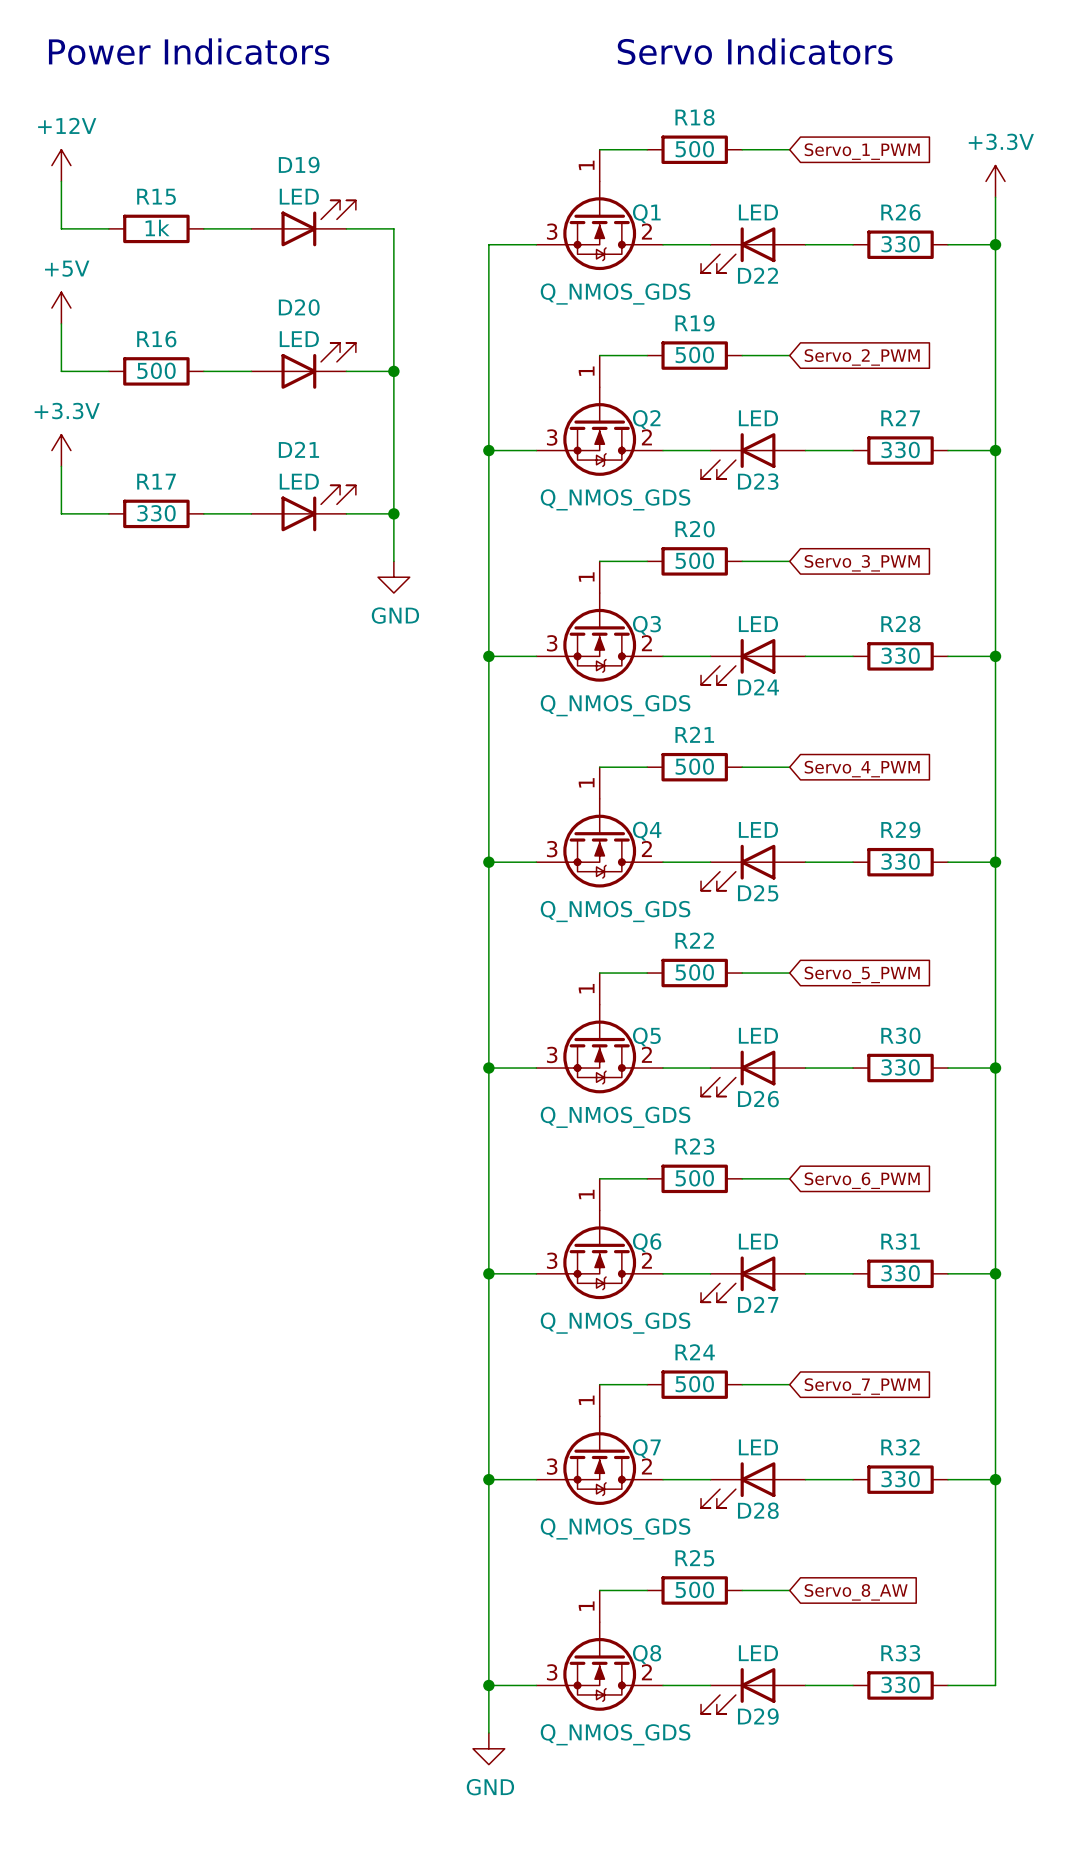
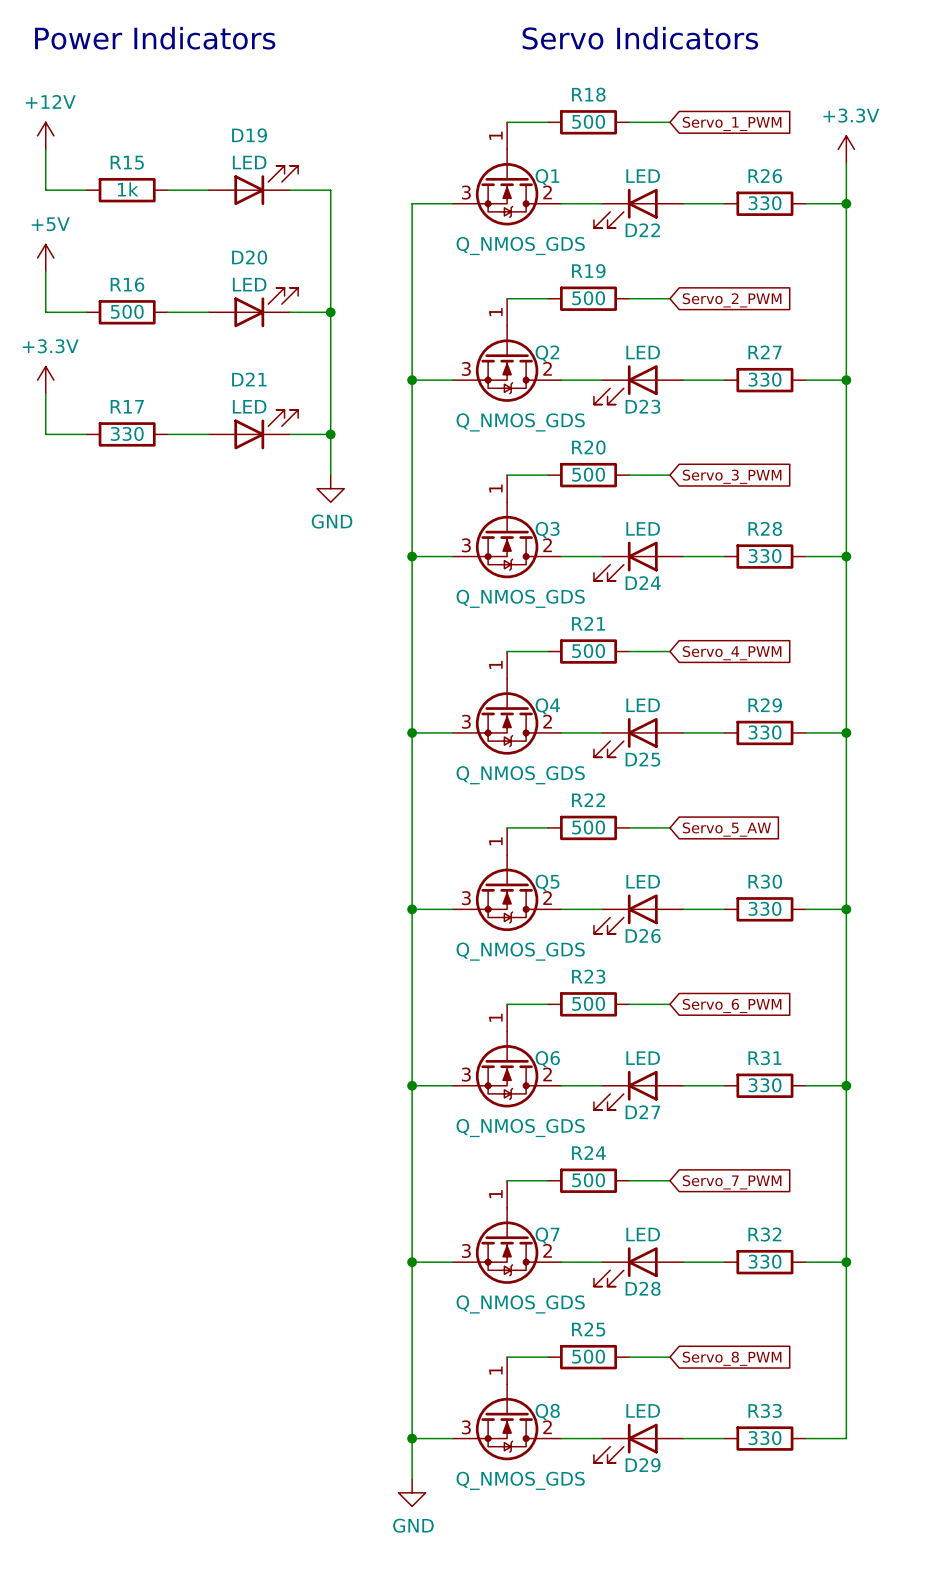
global label: Servo_5_PWM (862, 974) -> Servo_5_AW (726, 829)
global label: Servo_8_AW (856, 1592) -> Servo_8_PWM (732, 1358)

